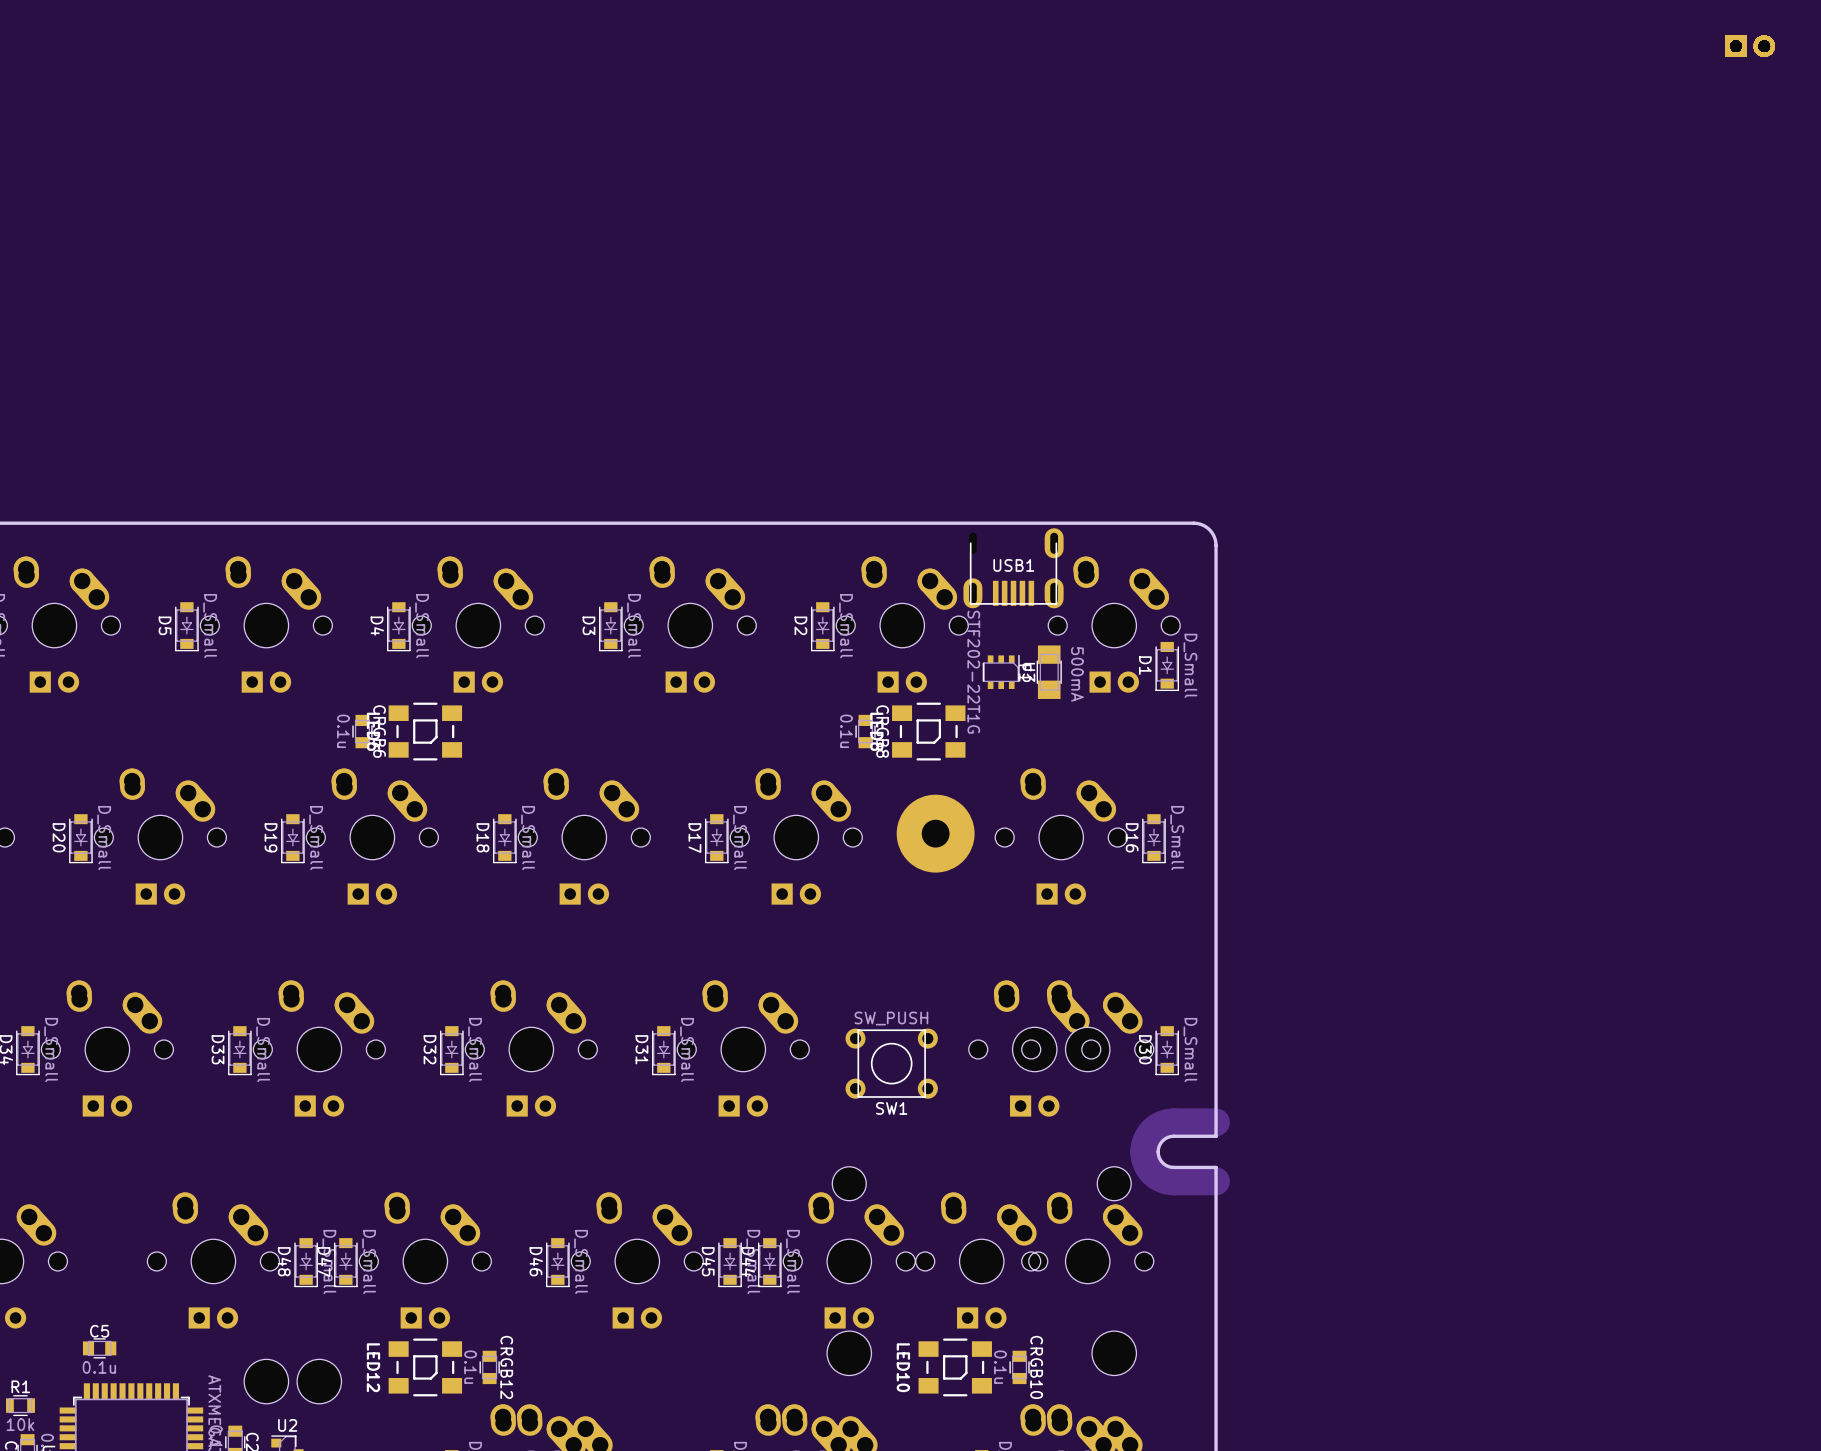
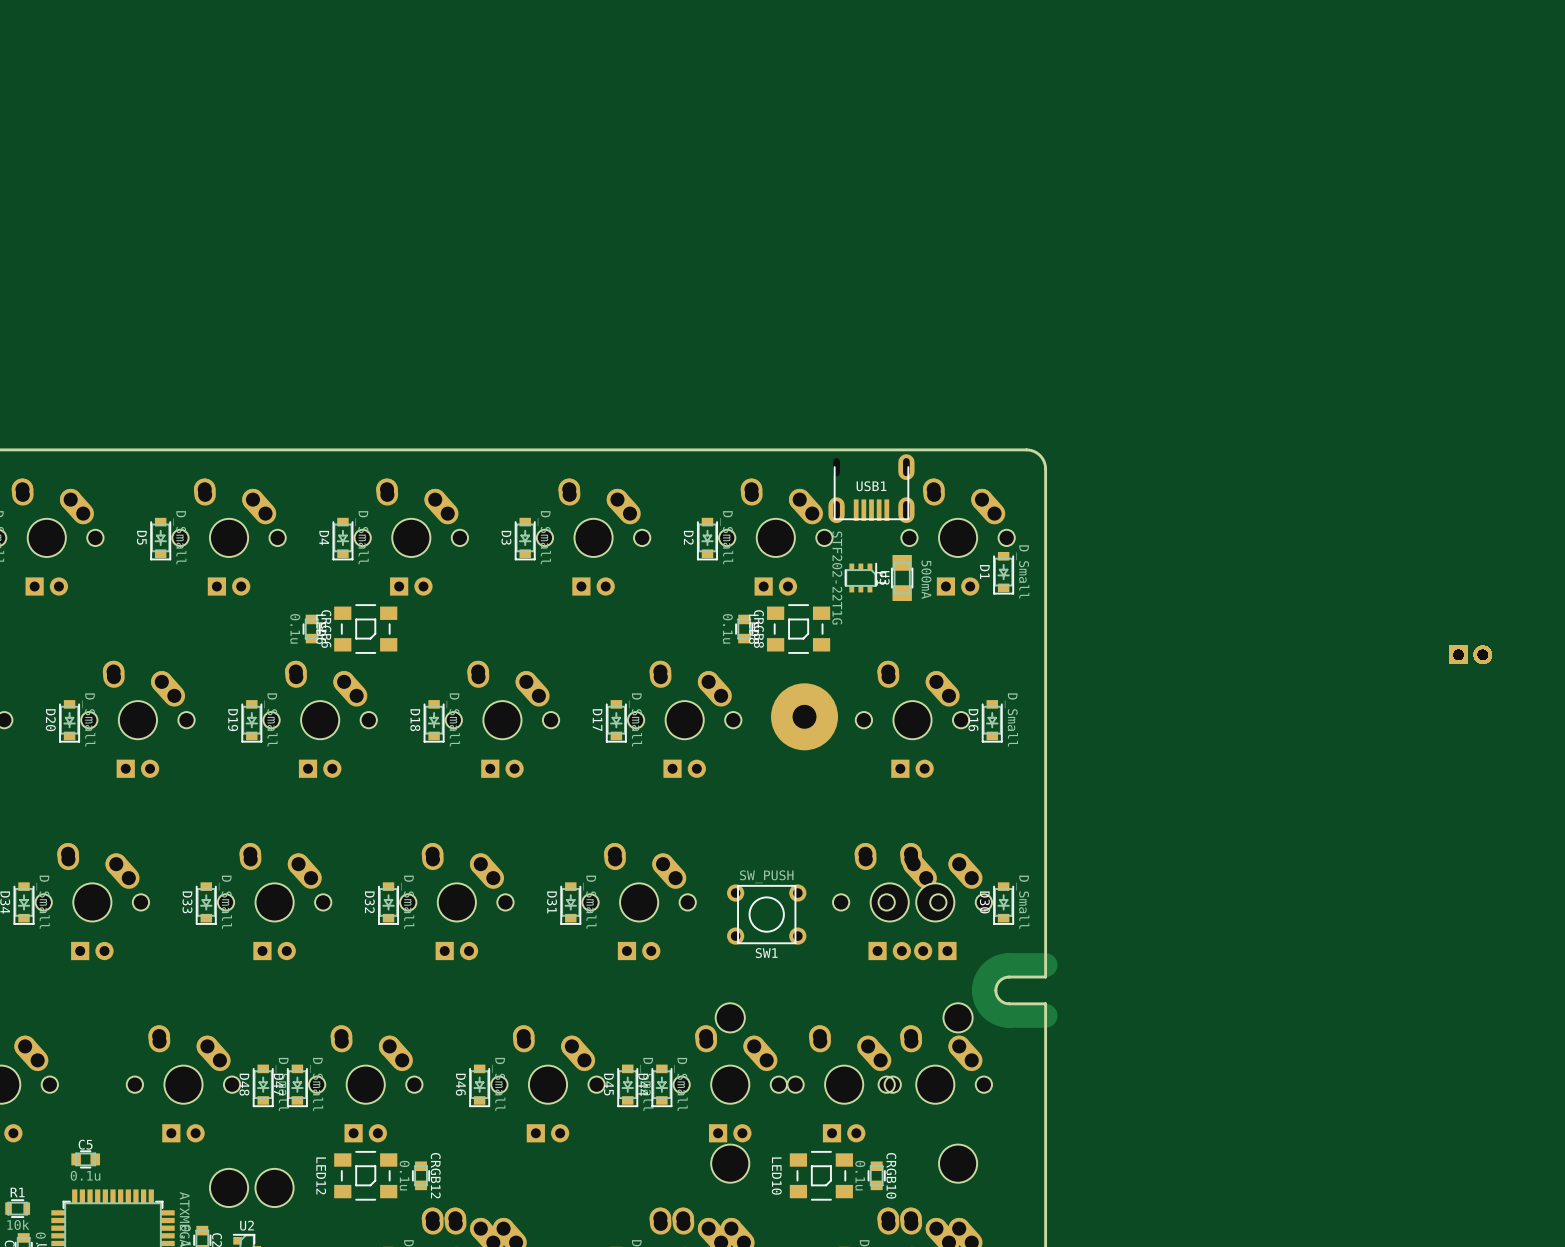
part: (1750, 46) -> none
part: none -> (1470, 654)
part: none -> (935, 951)

